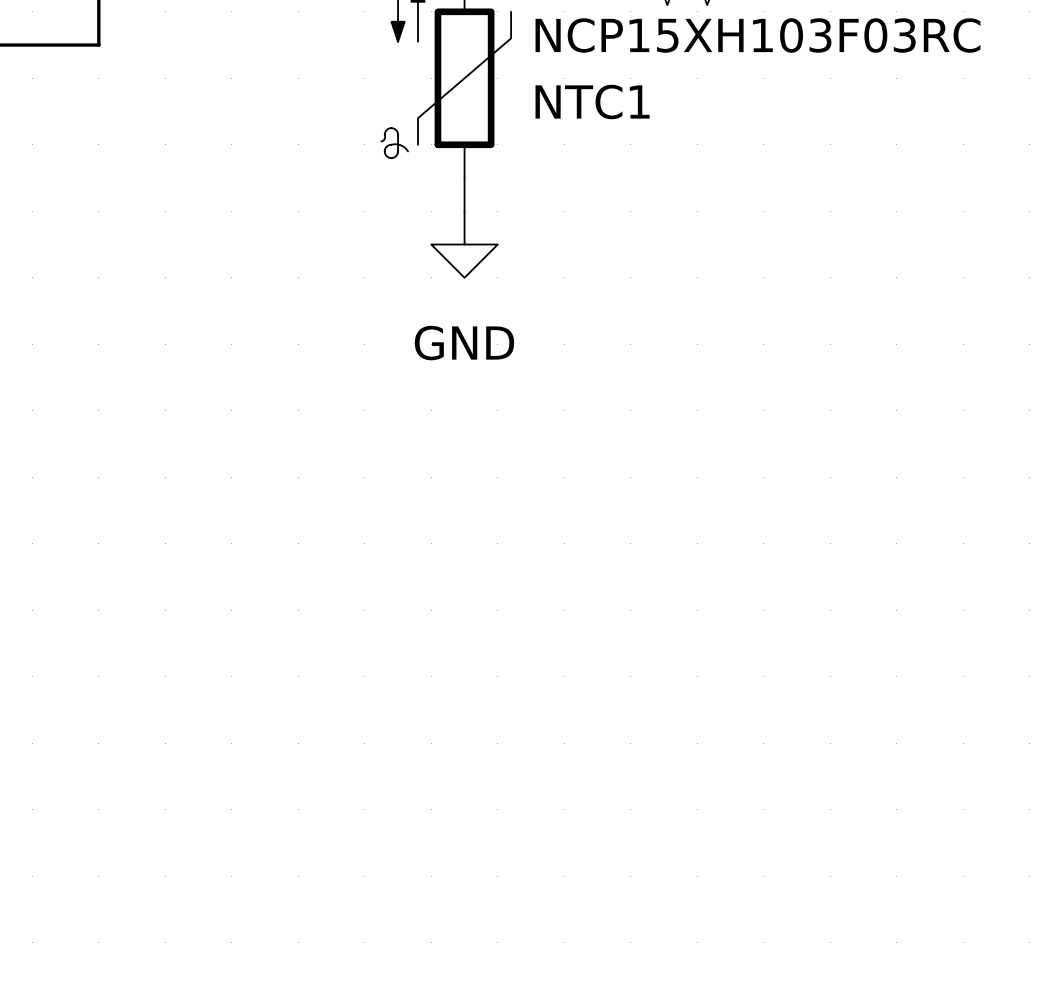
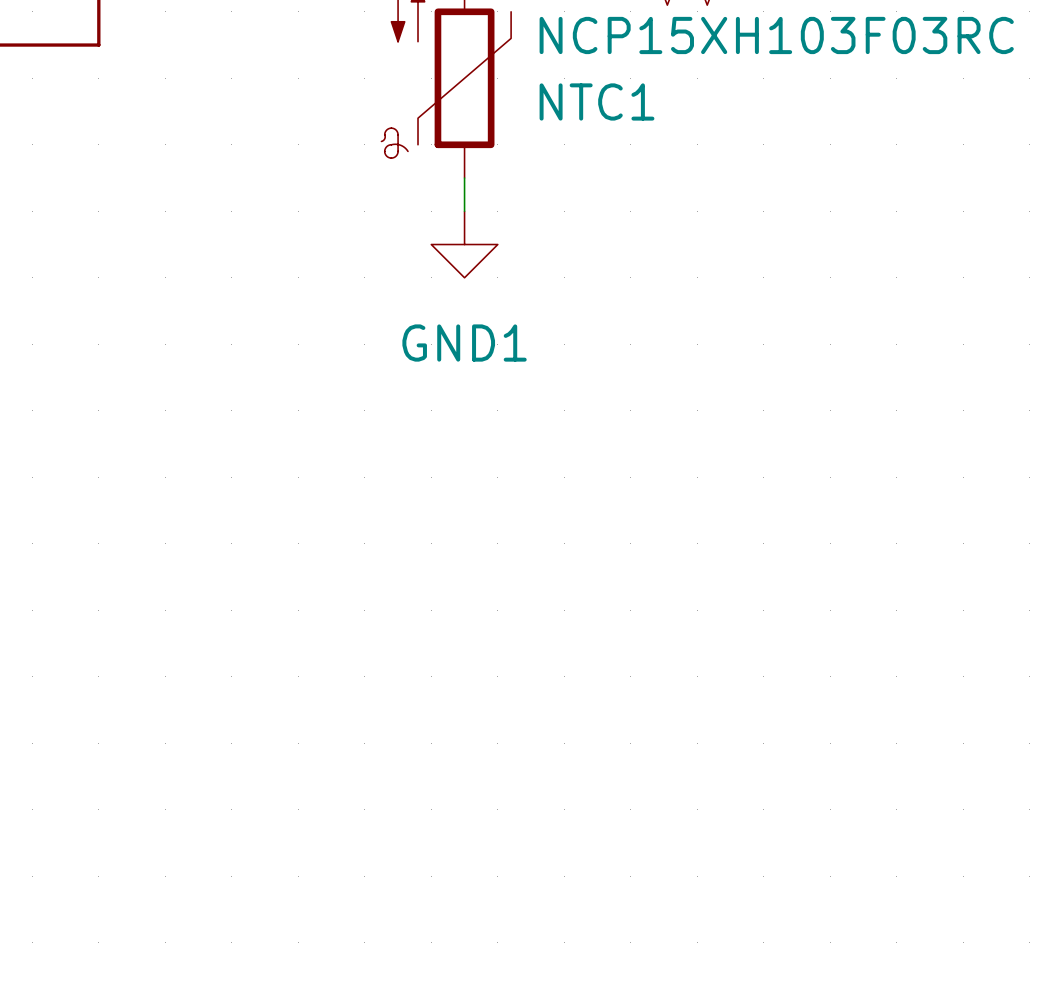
power symbol: GND (464, 244) -> GND1 (464, 244)

